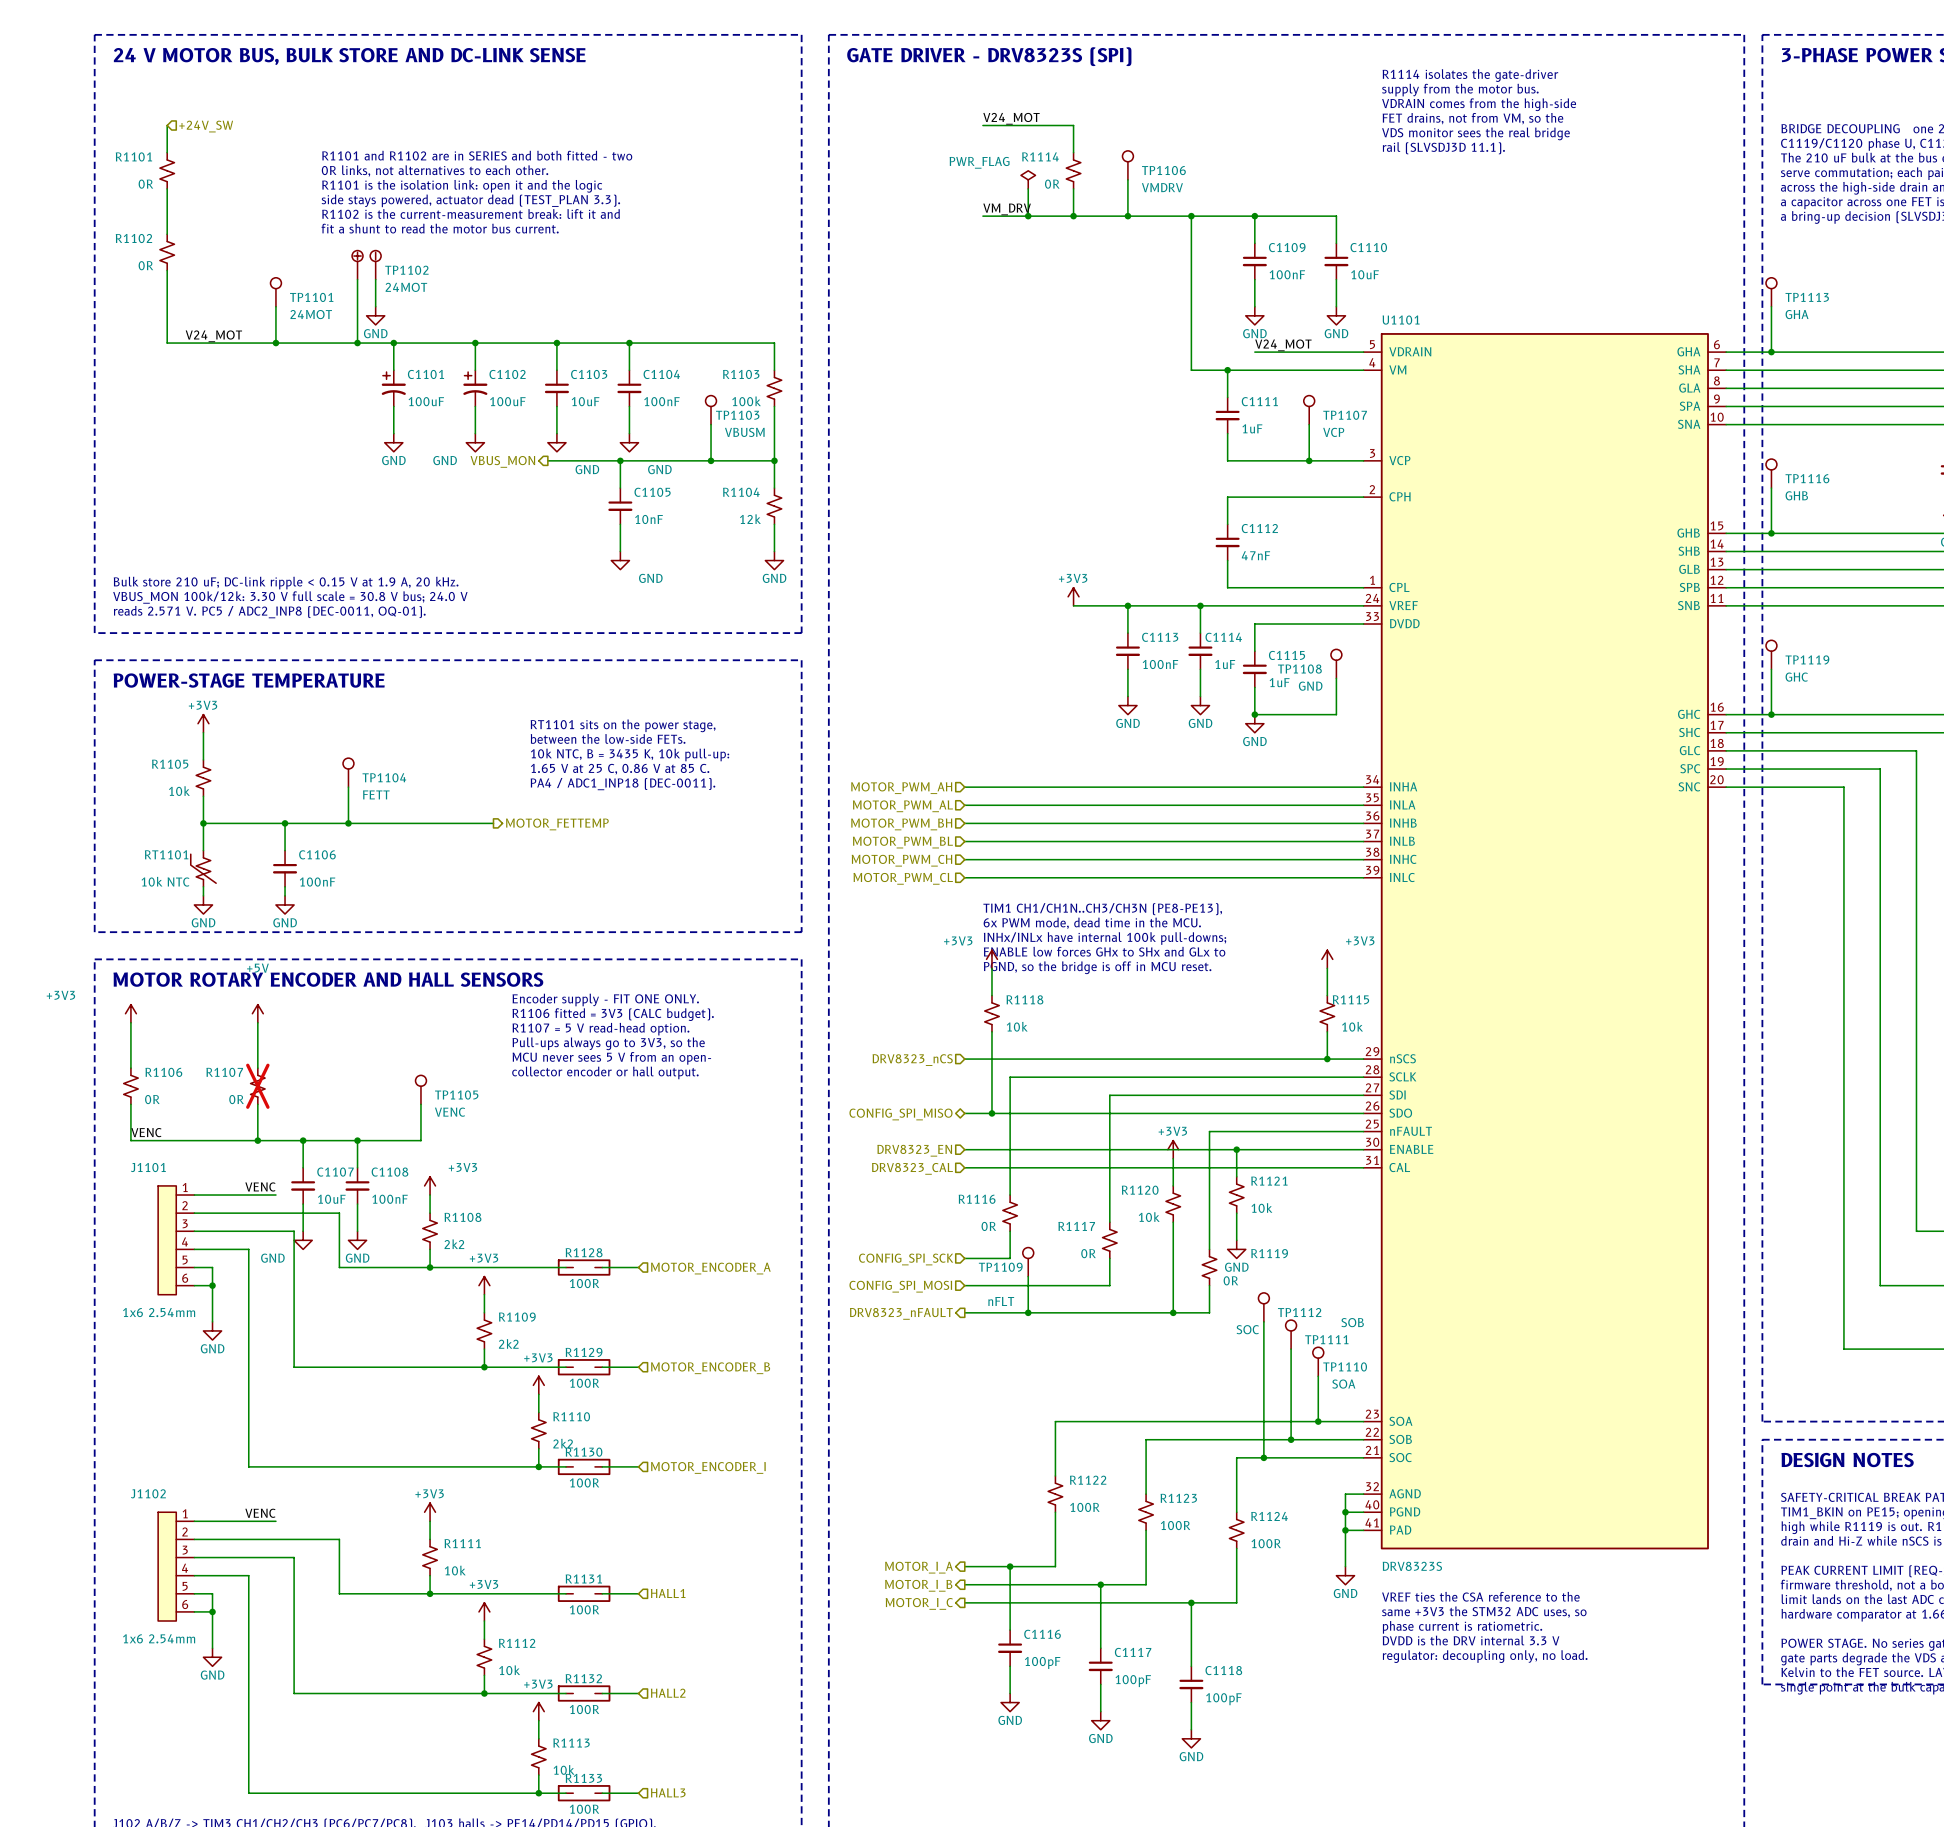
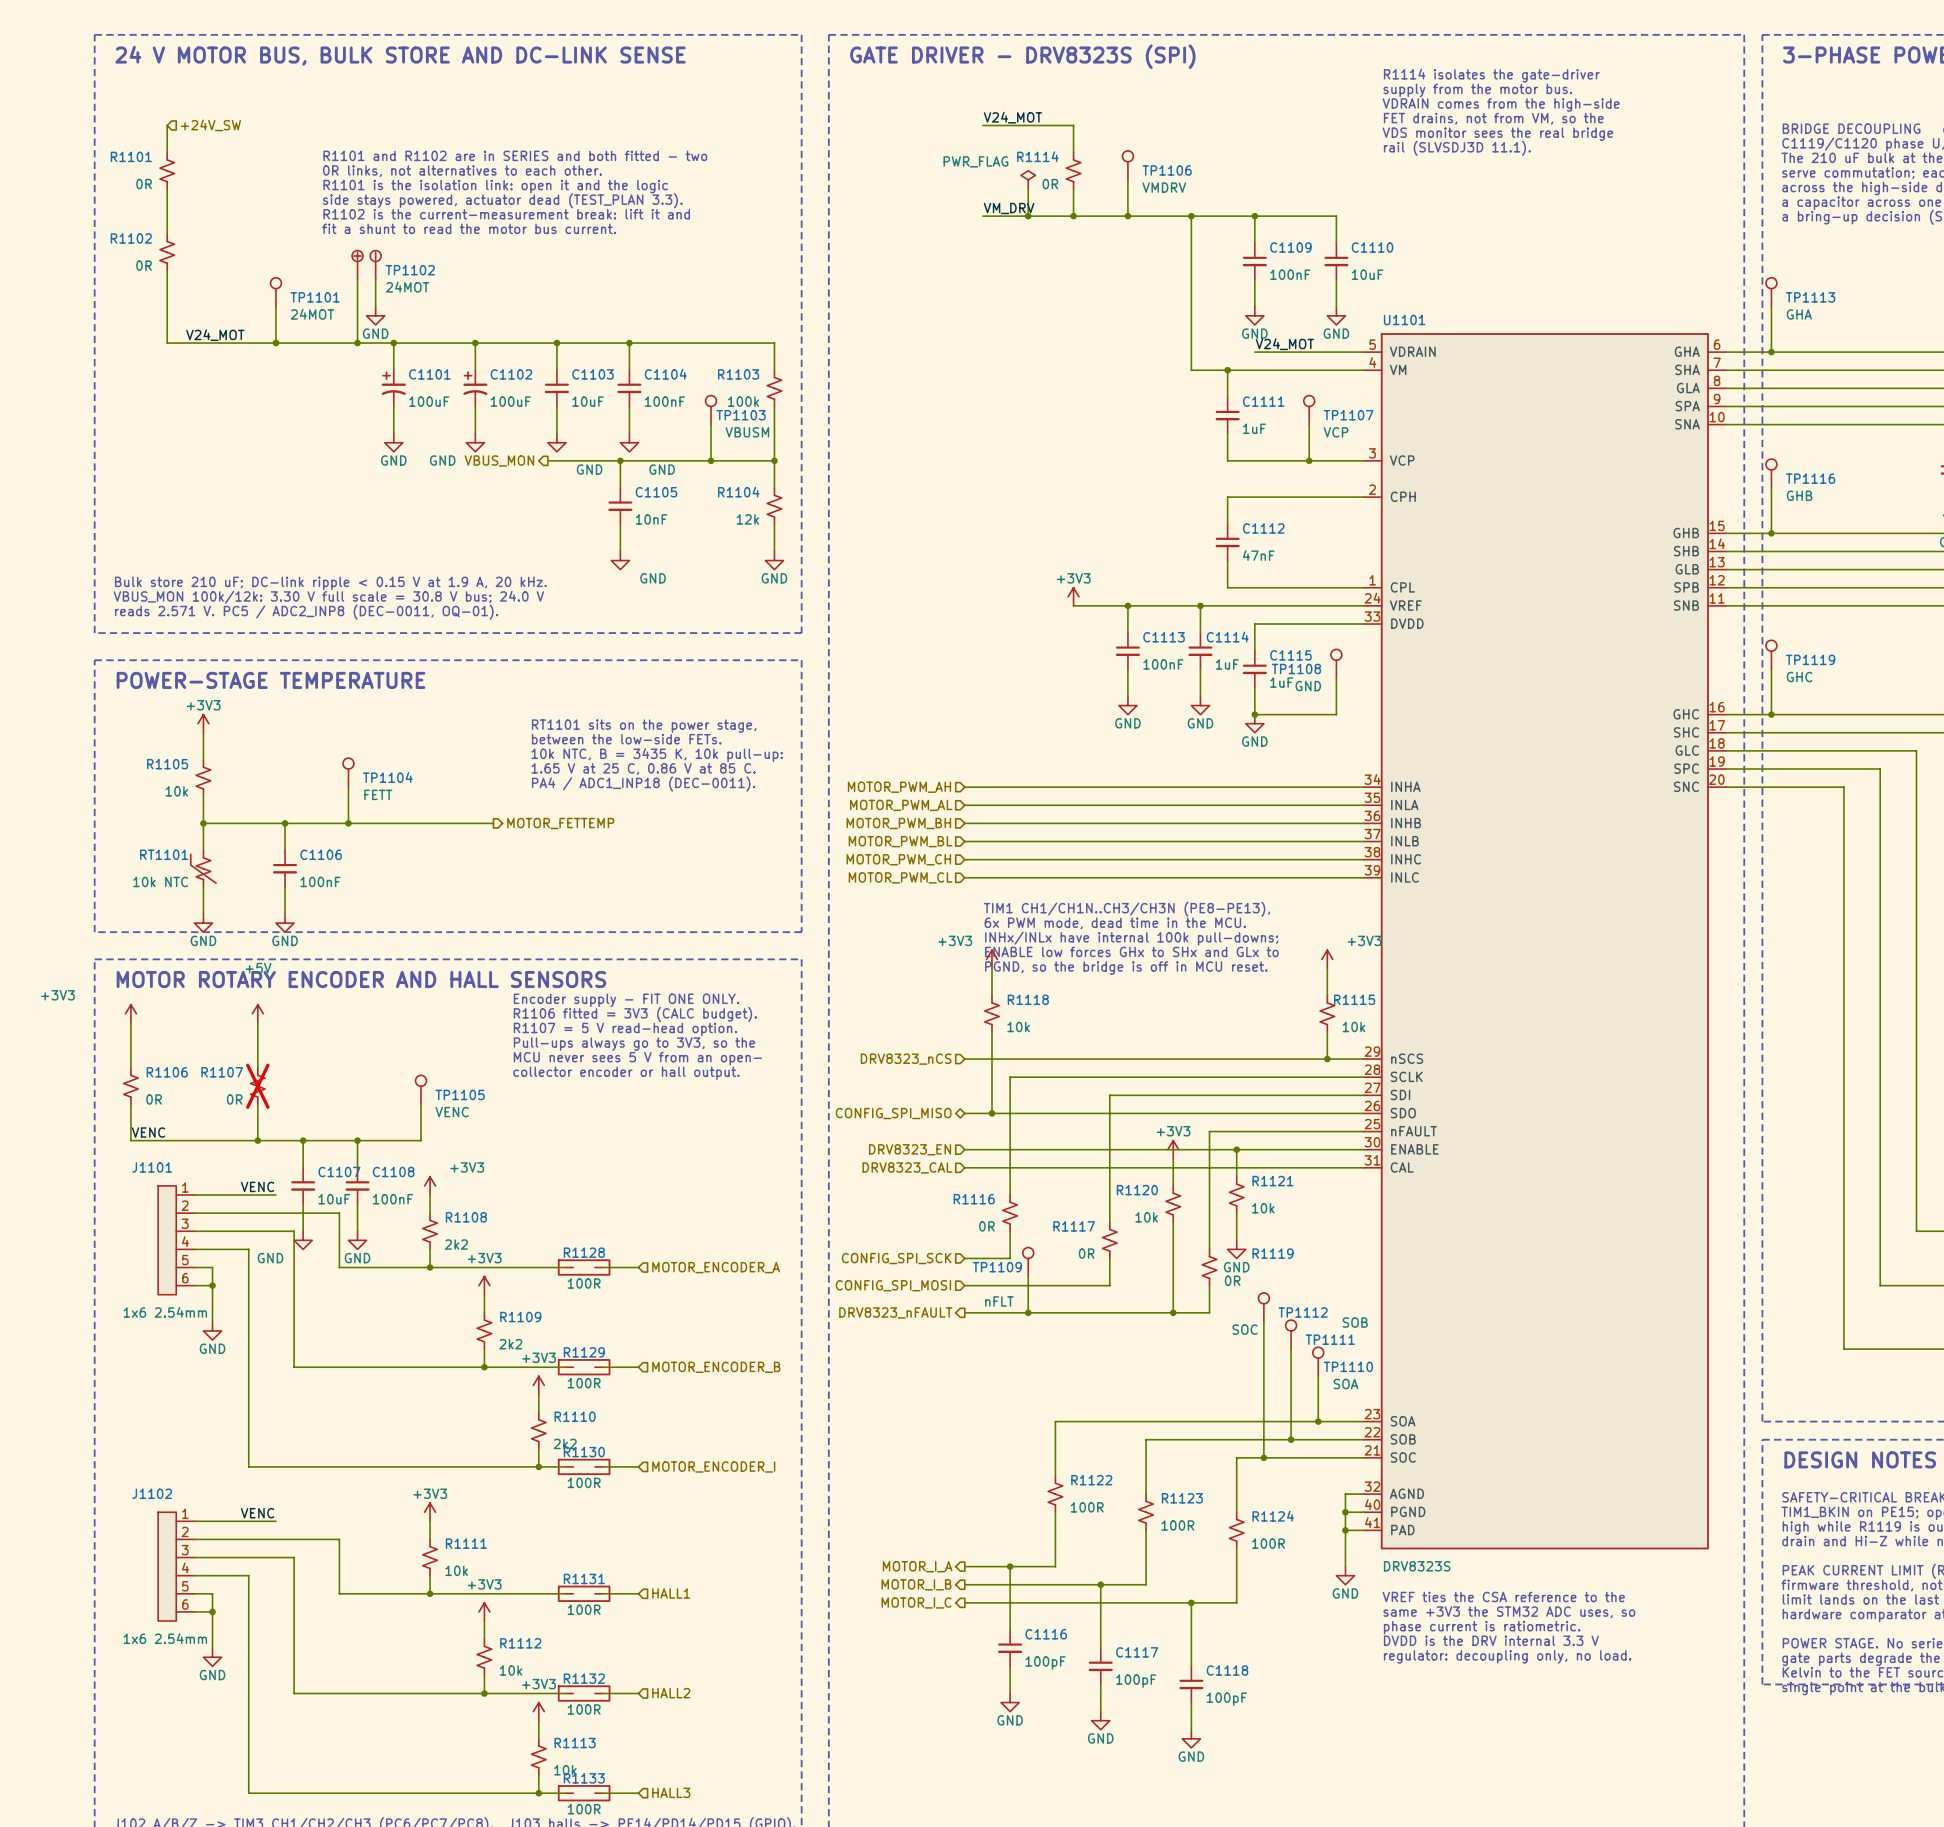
power symbol position: GND (203, 904) -> GND (203, 923)
power symbol position: GND (285, 904) -> GND (285, 923)

